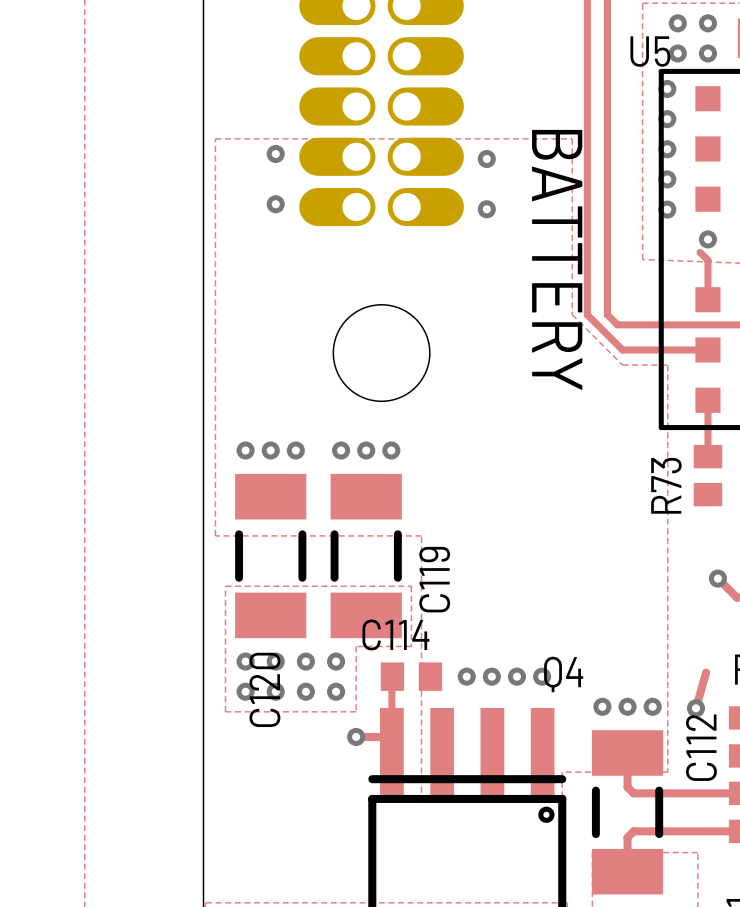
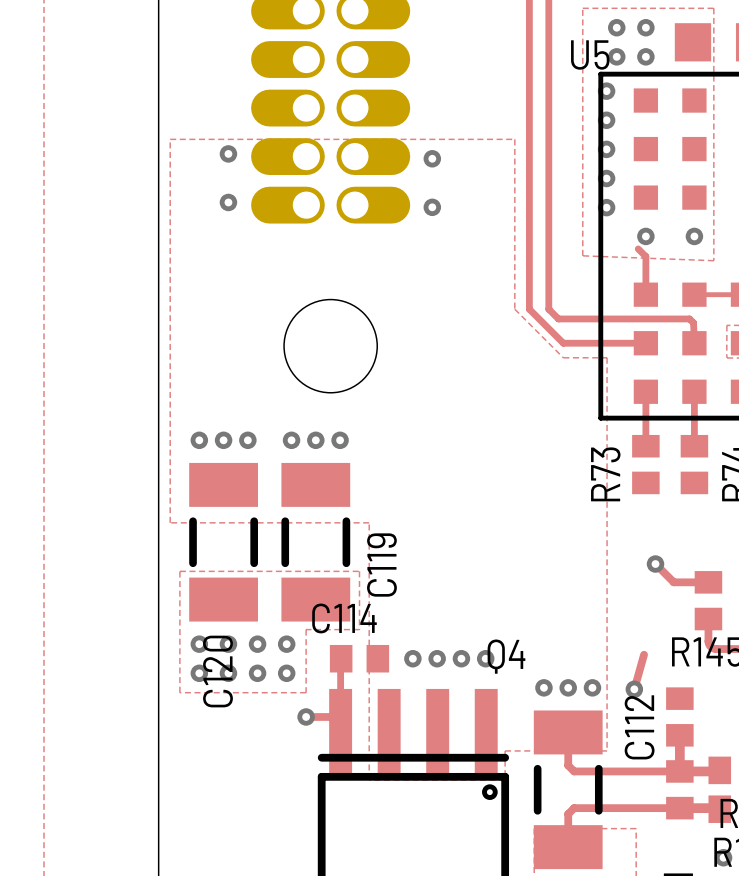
text: BATTERY (557, 259) -> none

